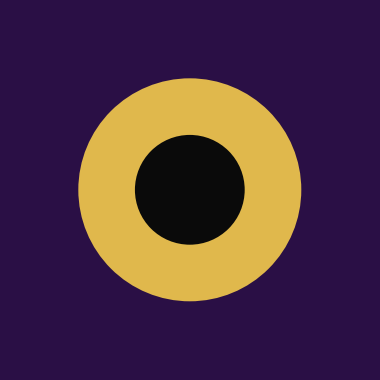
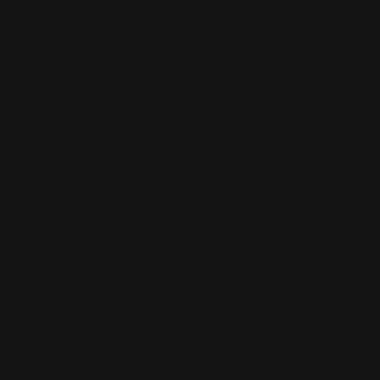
part: (189, 189) -> none

